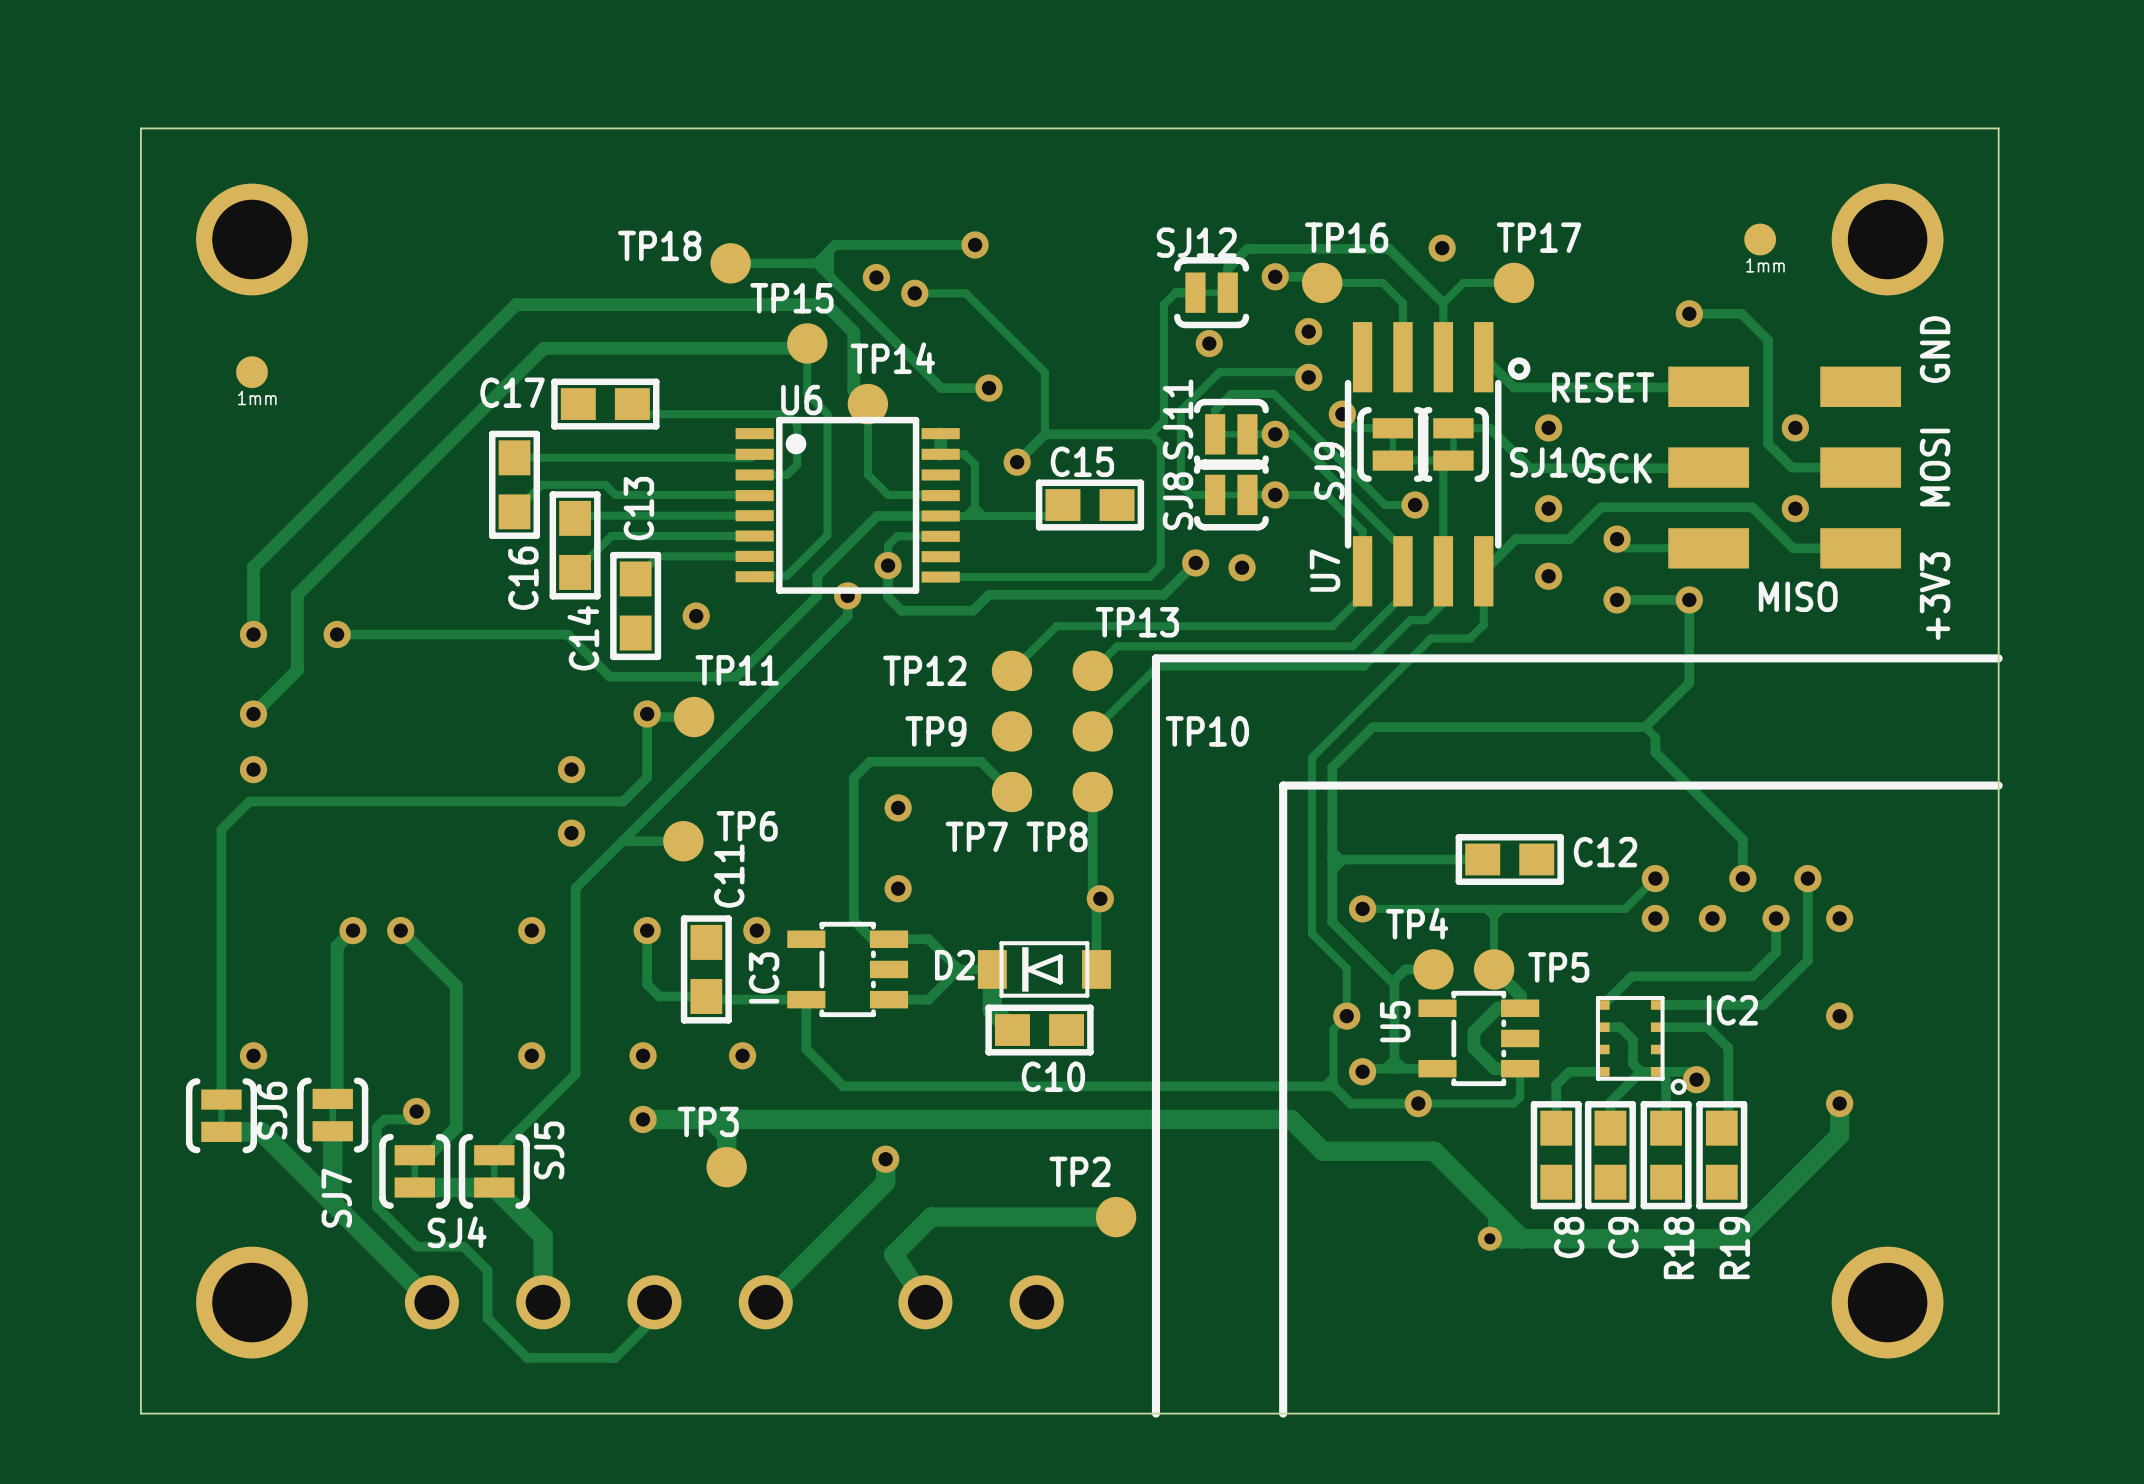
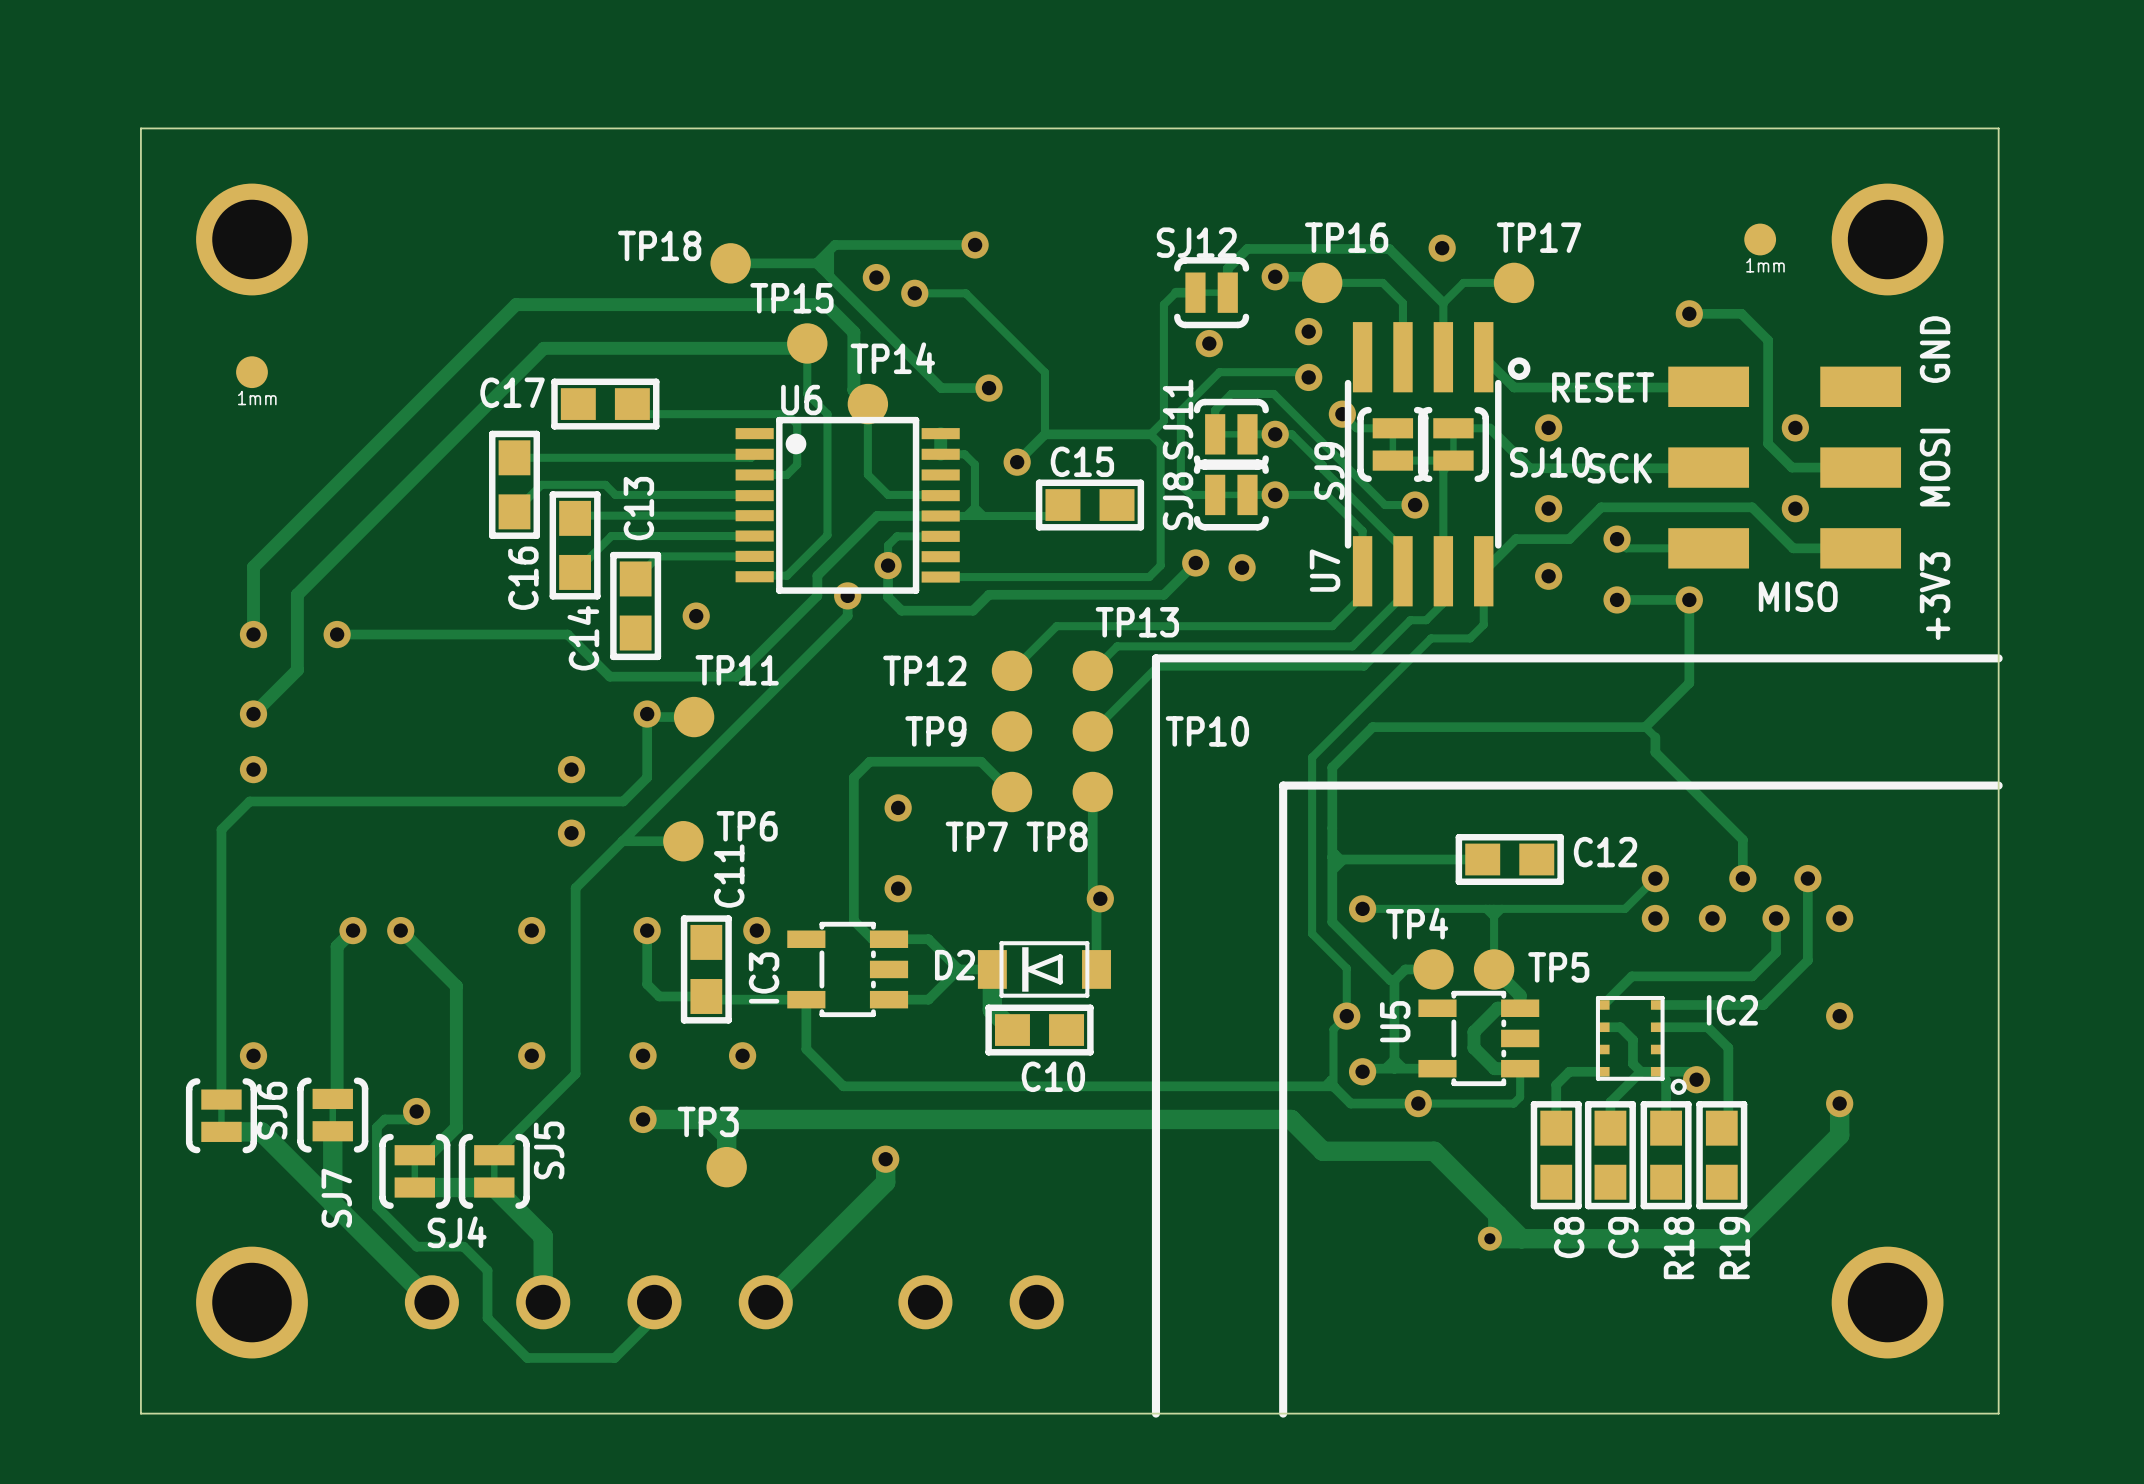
track: (1116, 1217) (931, 1217) (893, 1254) (925, 1302) -> none
TP2: (1116, 1217) -> none

